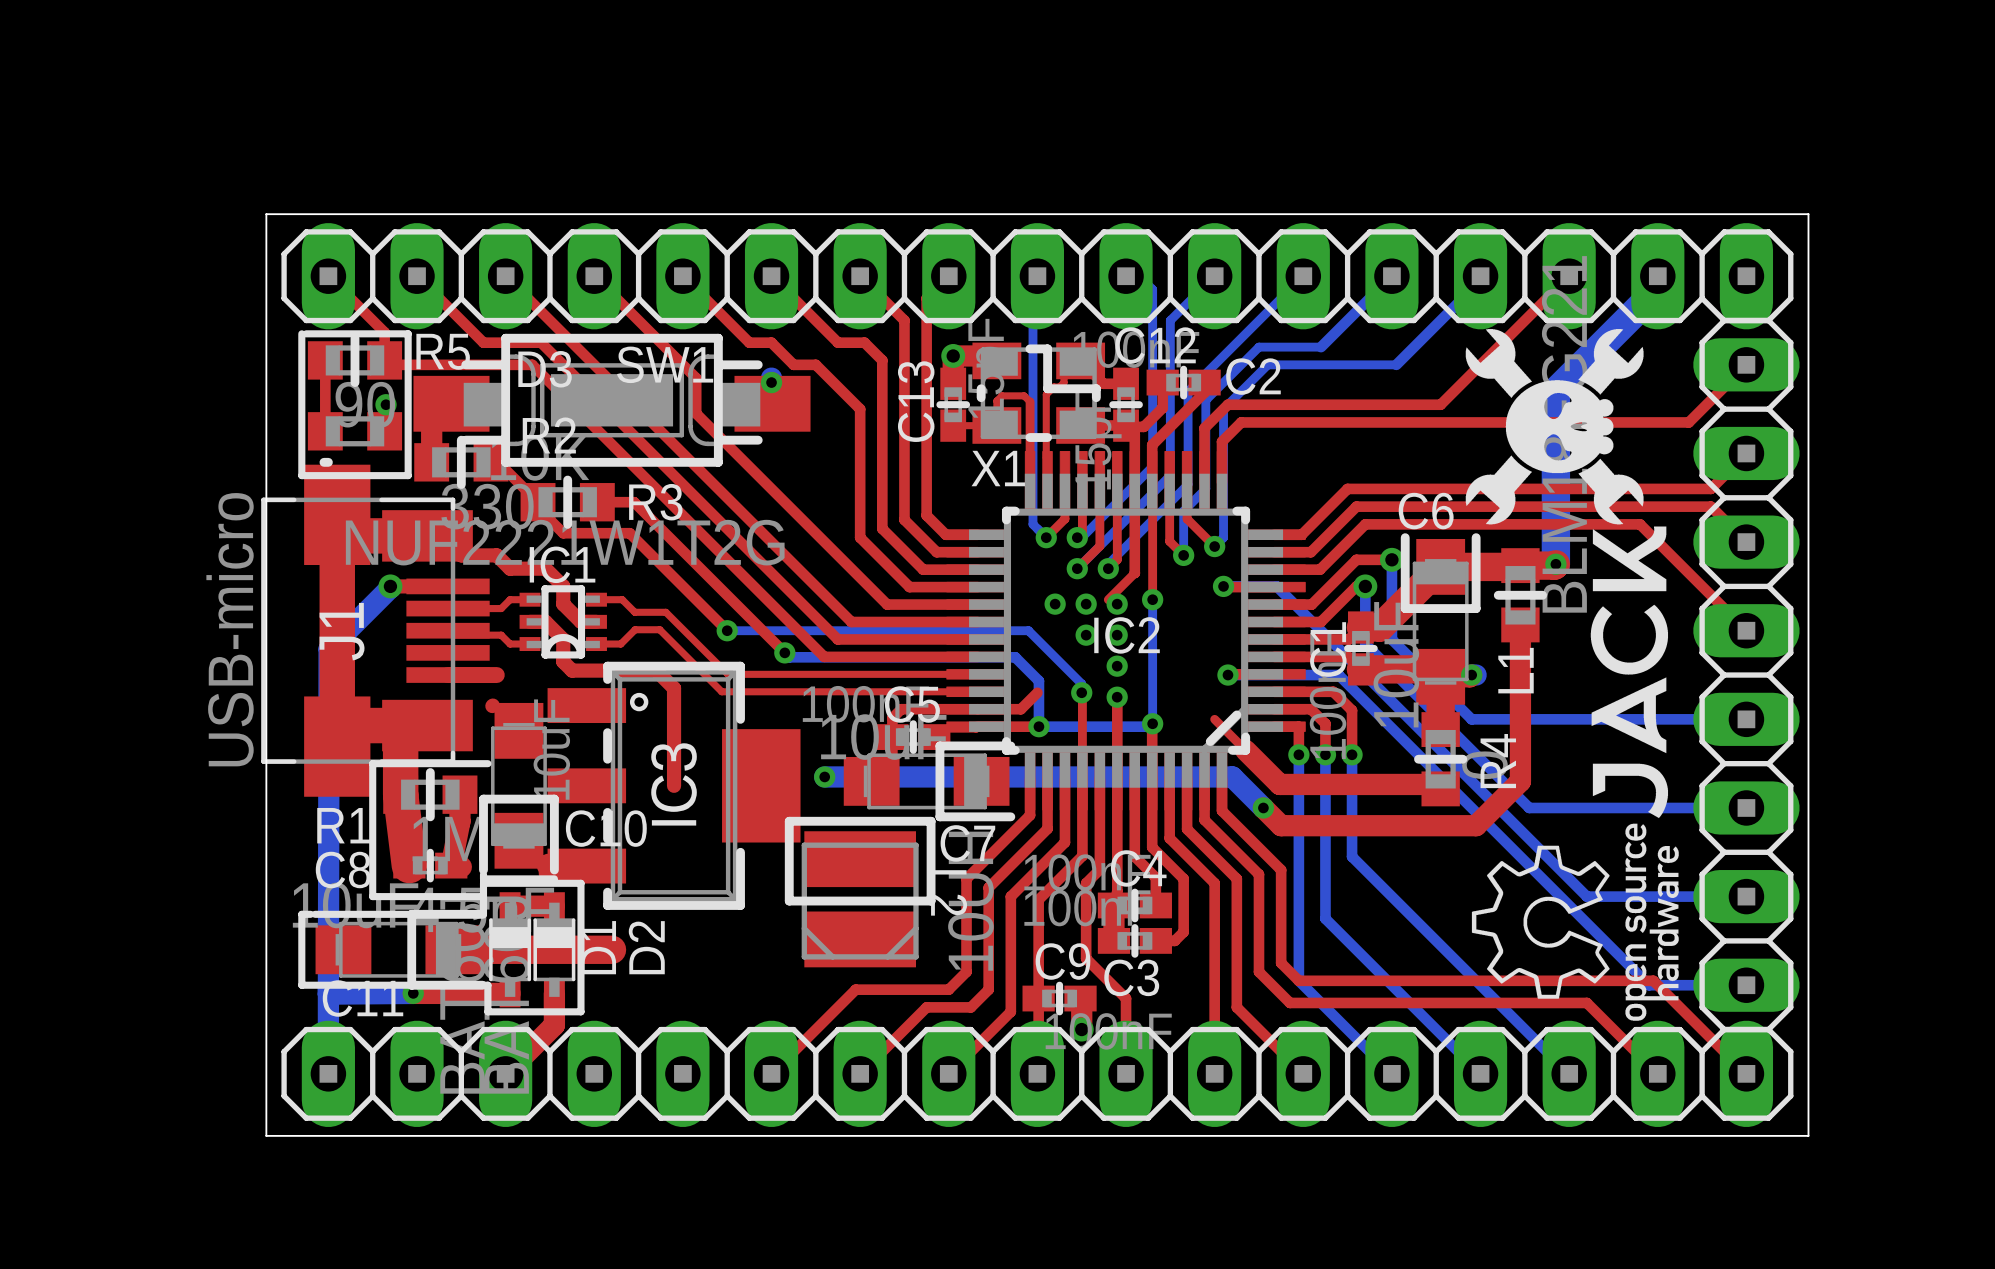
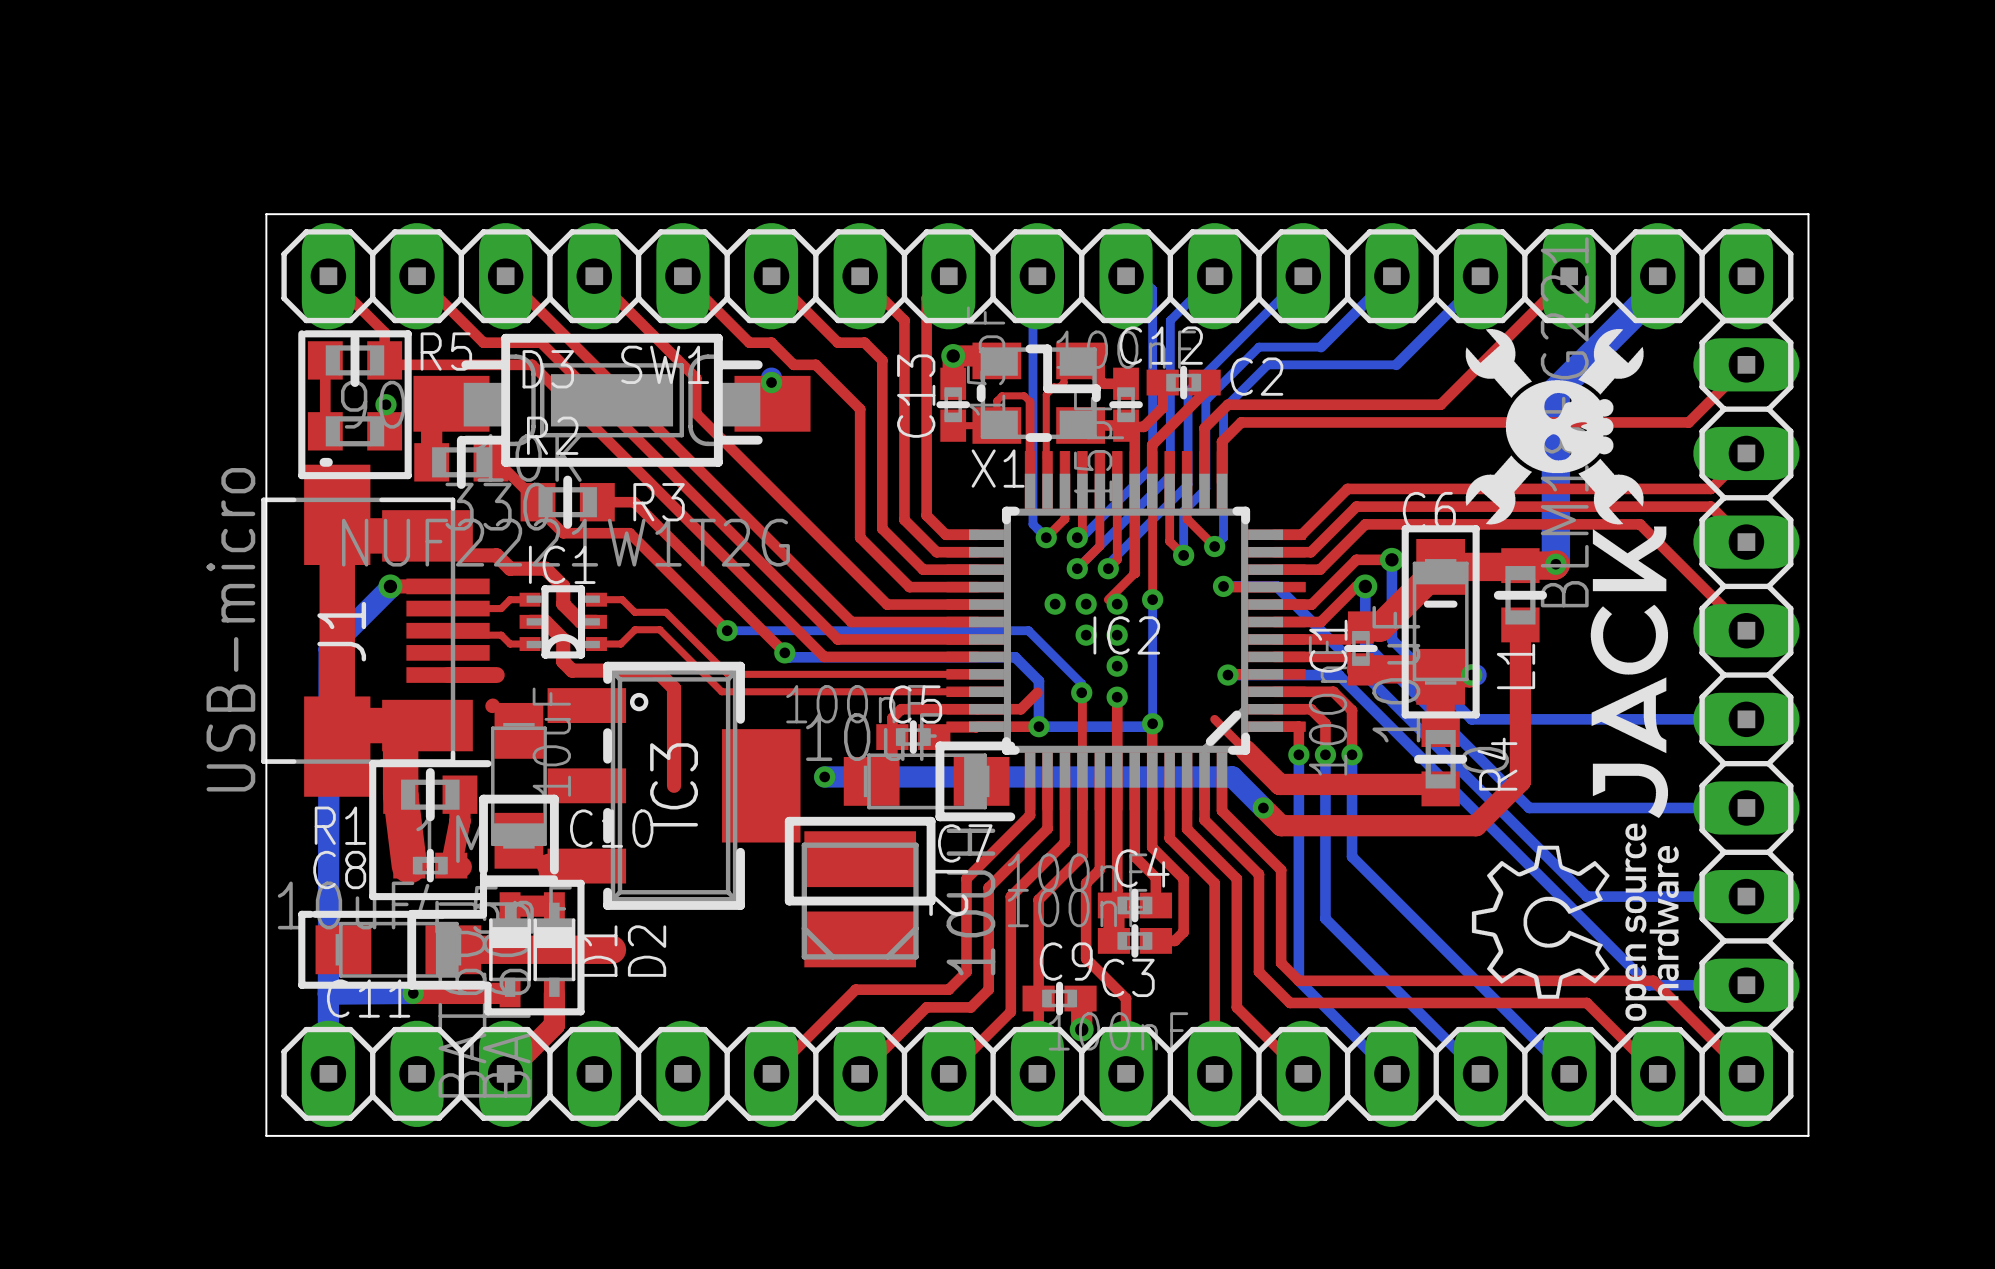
C6 footprint: [1400, 533, 1481, 705] -> [1401, 525, 1480, 719]

